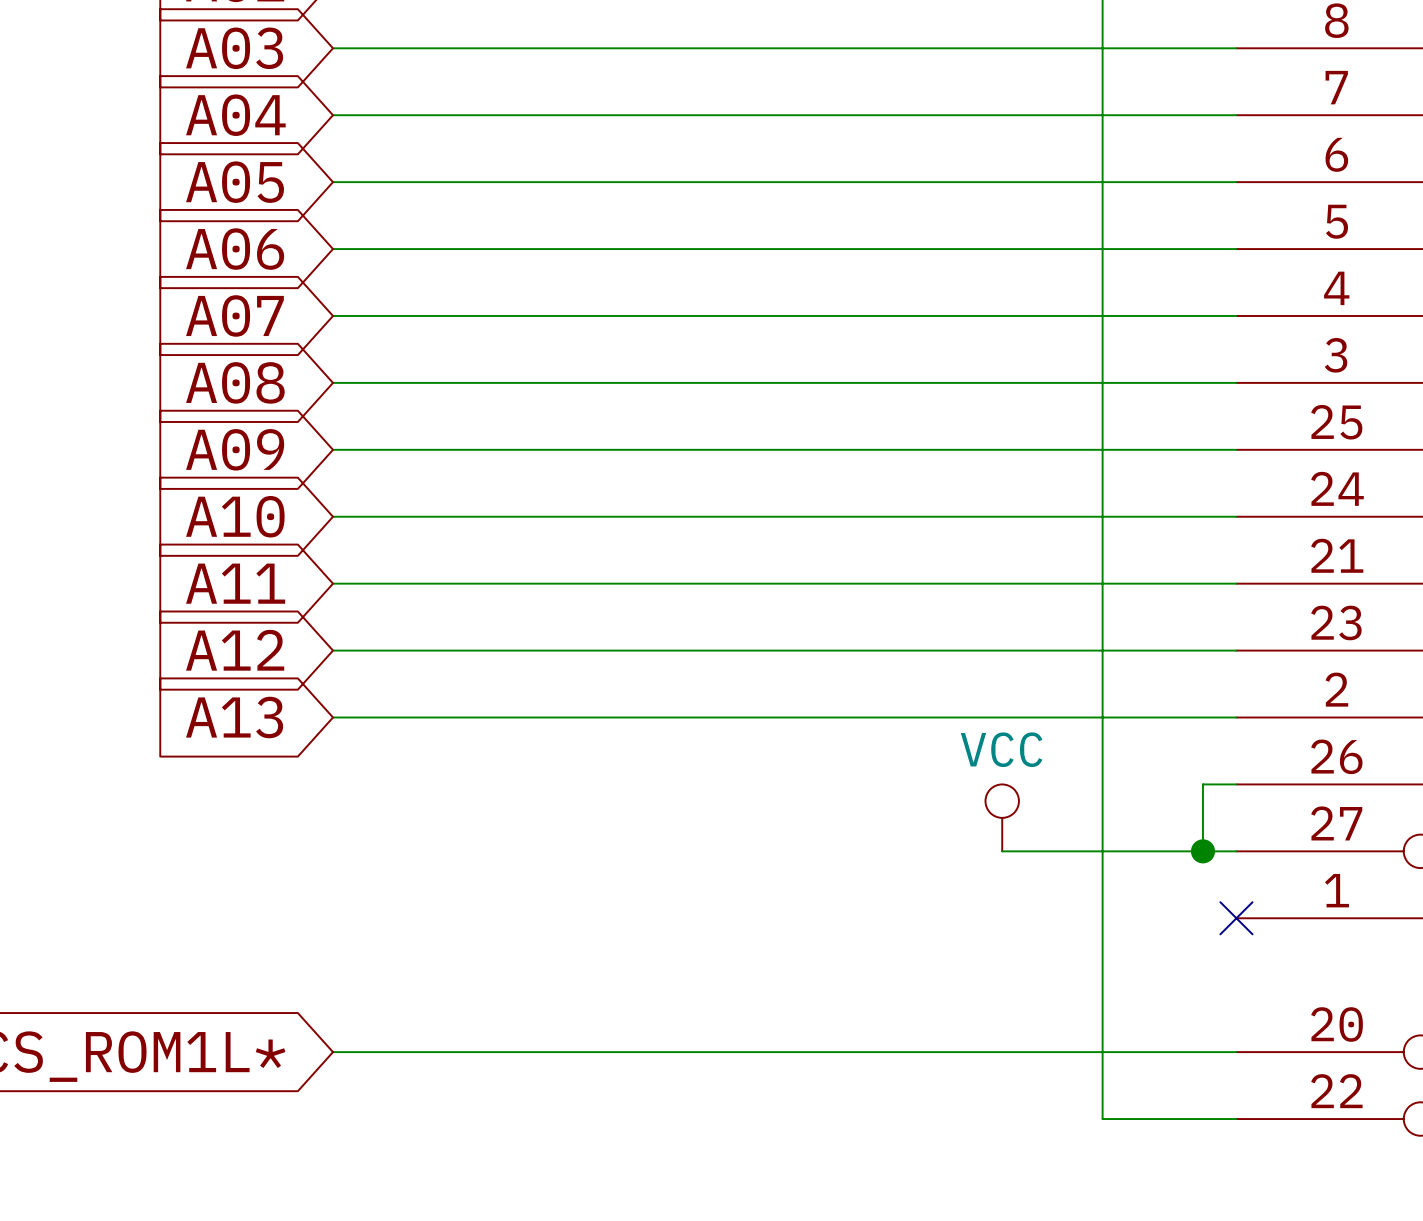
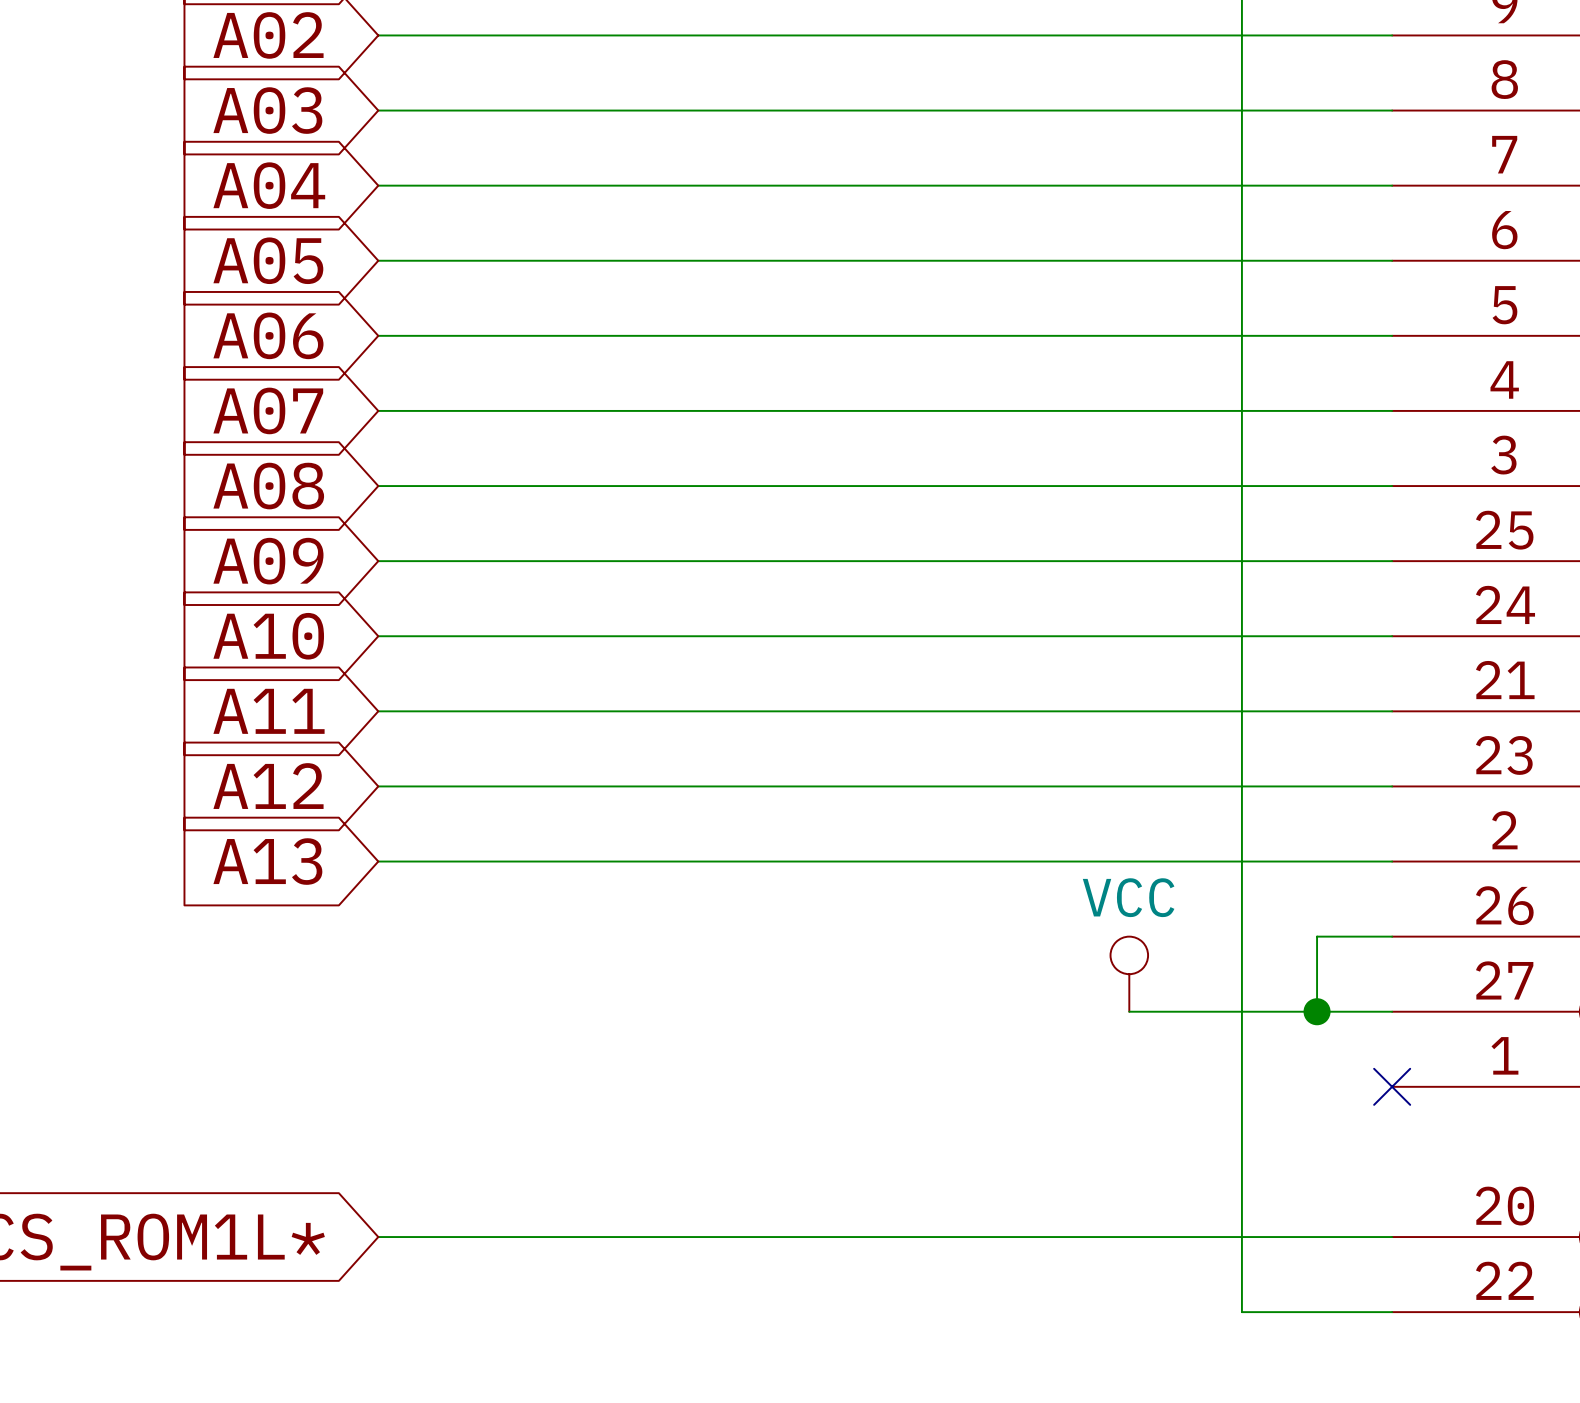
wire: (1202, 784) (1202, 851) -> (1354, 936) (1317, 936) (1317, 1011)
junction position: (1202, 851) -> (1317, 1011)

